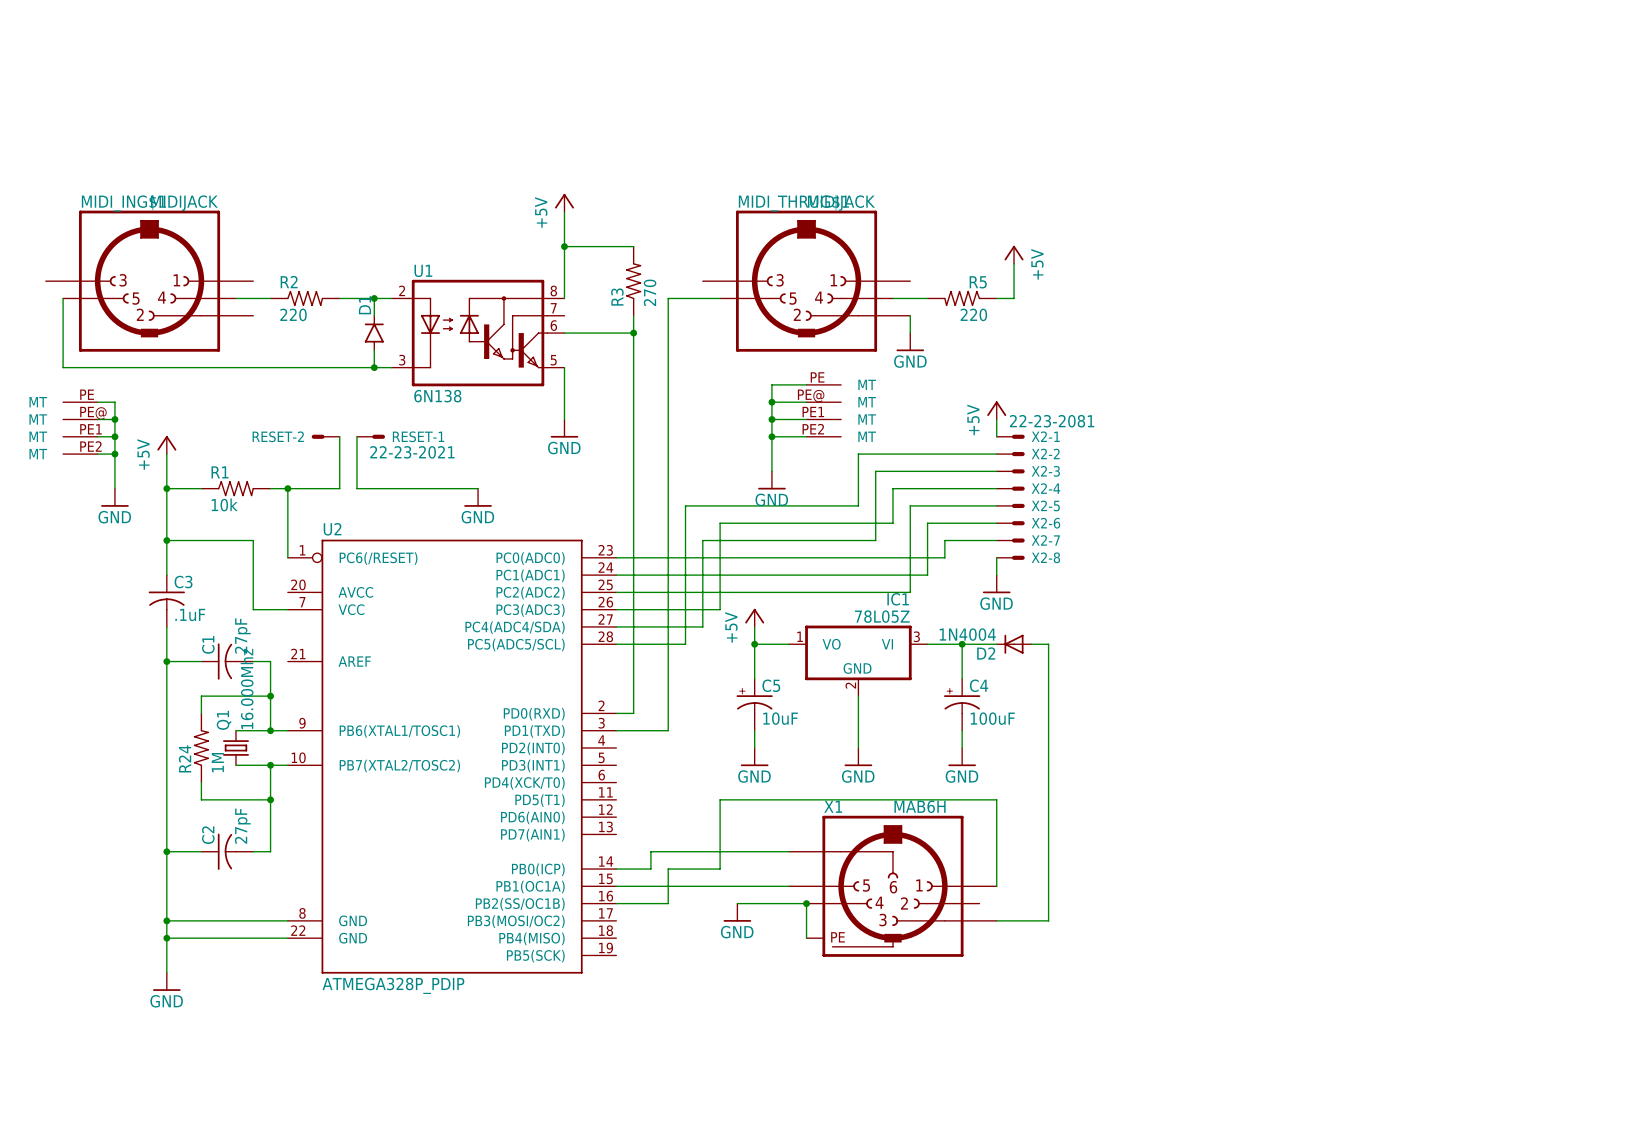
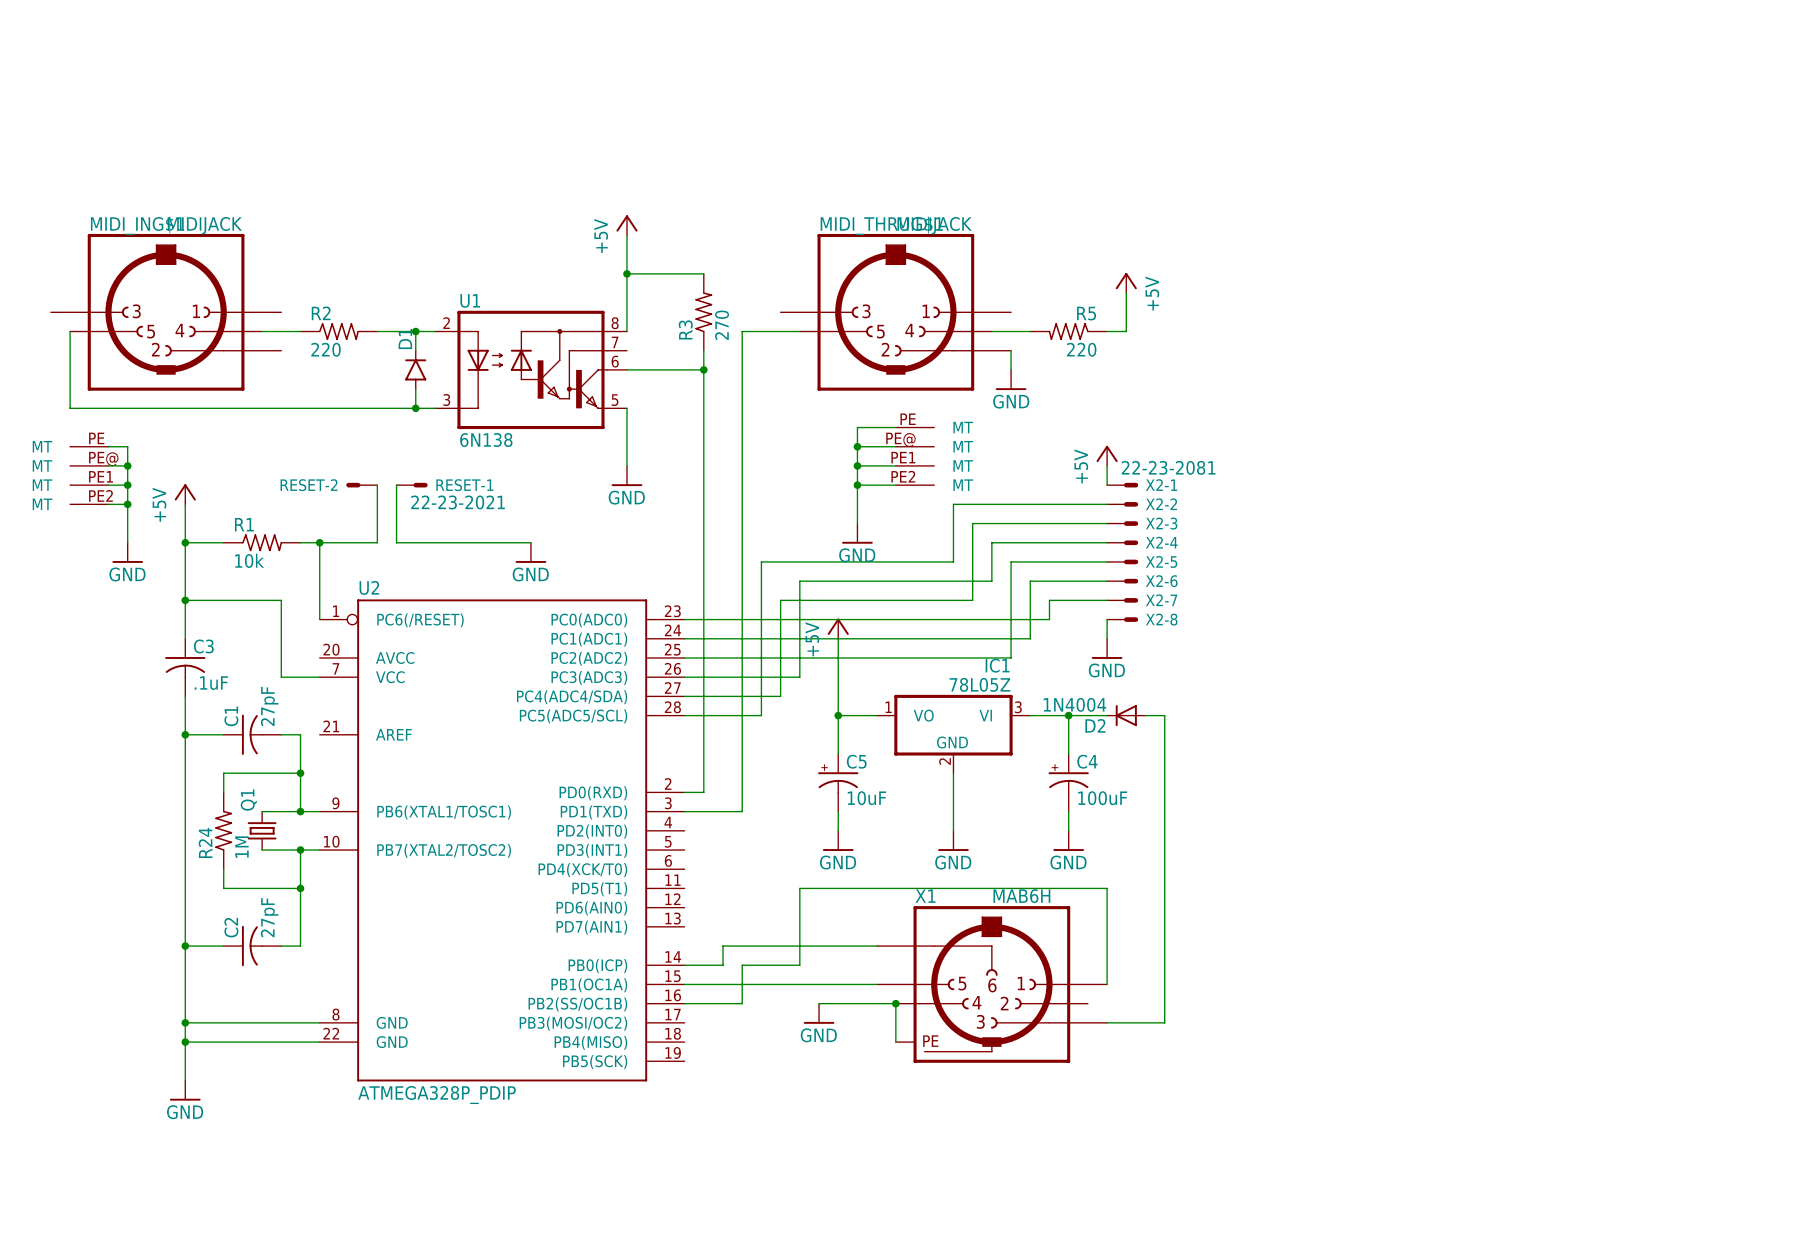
wire: none -> (838, 638) (838, 696)
power symbol position: +5V (754, 617) -> +5V (838, 628)
Q1 value: 16.000Mhz (247, 688) -> none

